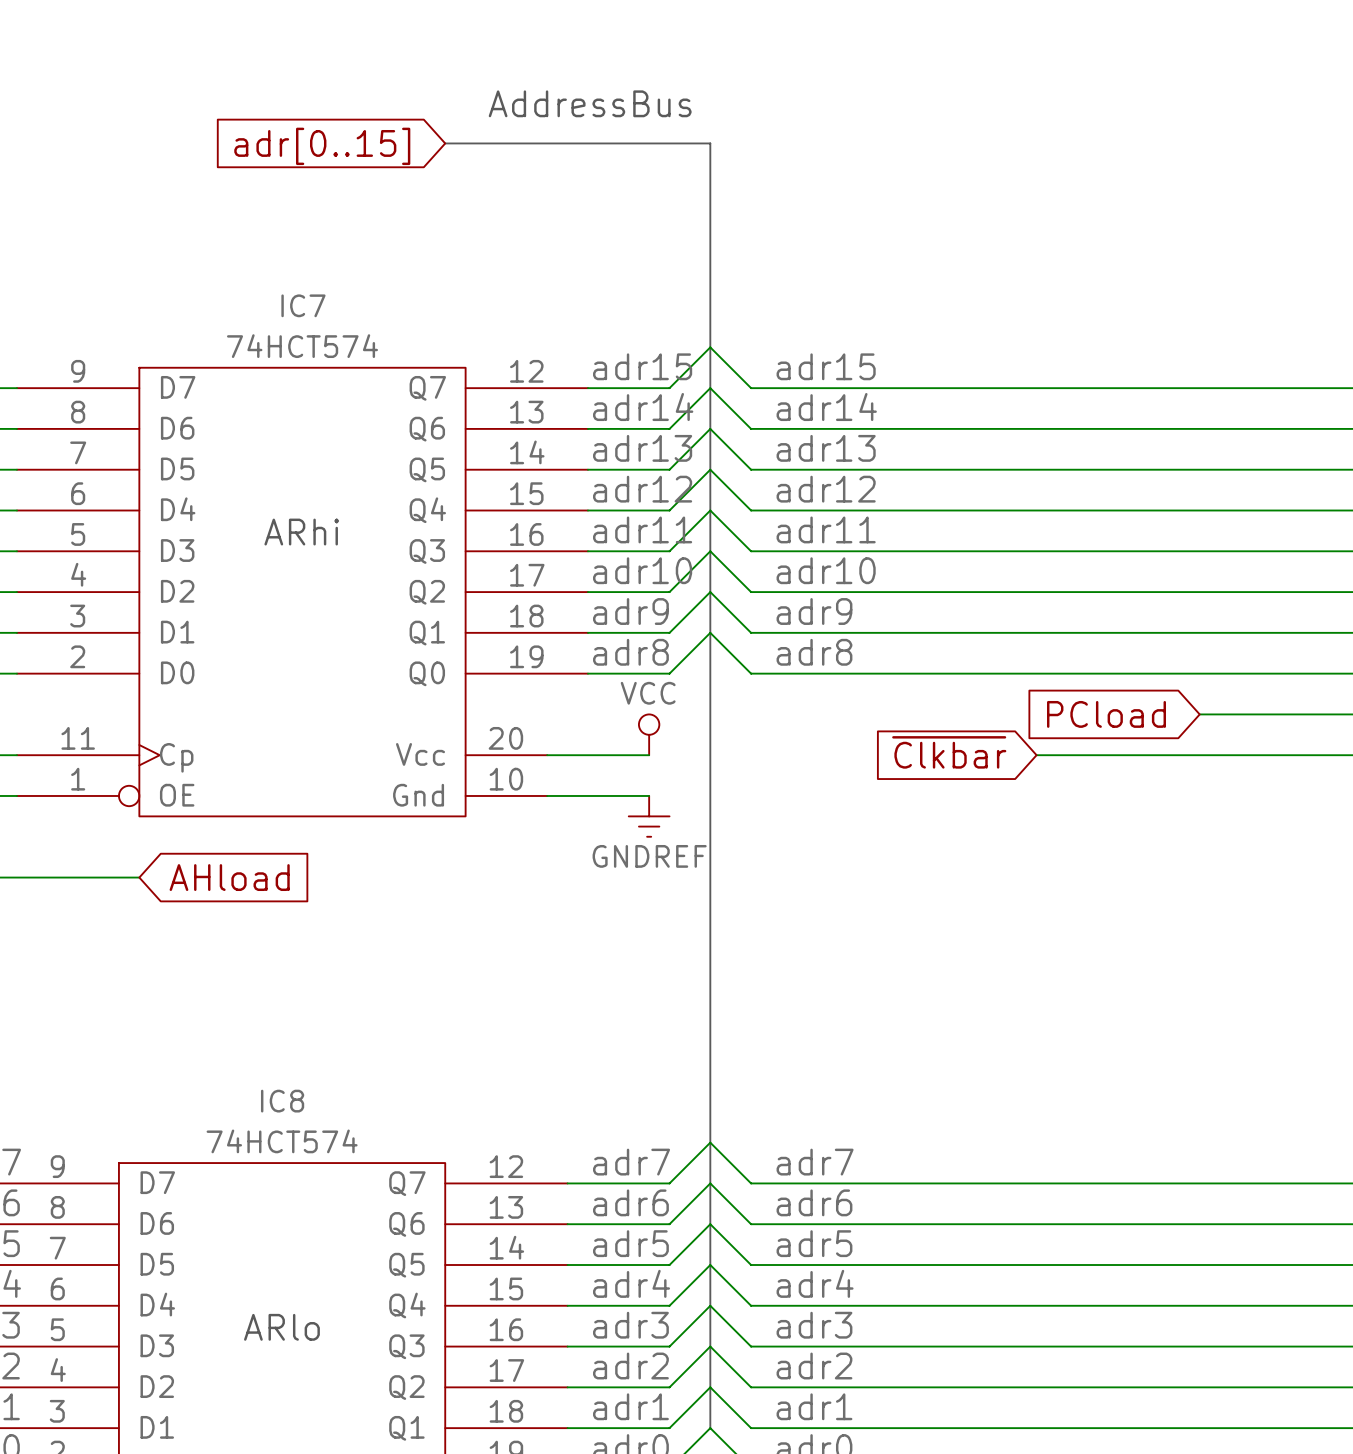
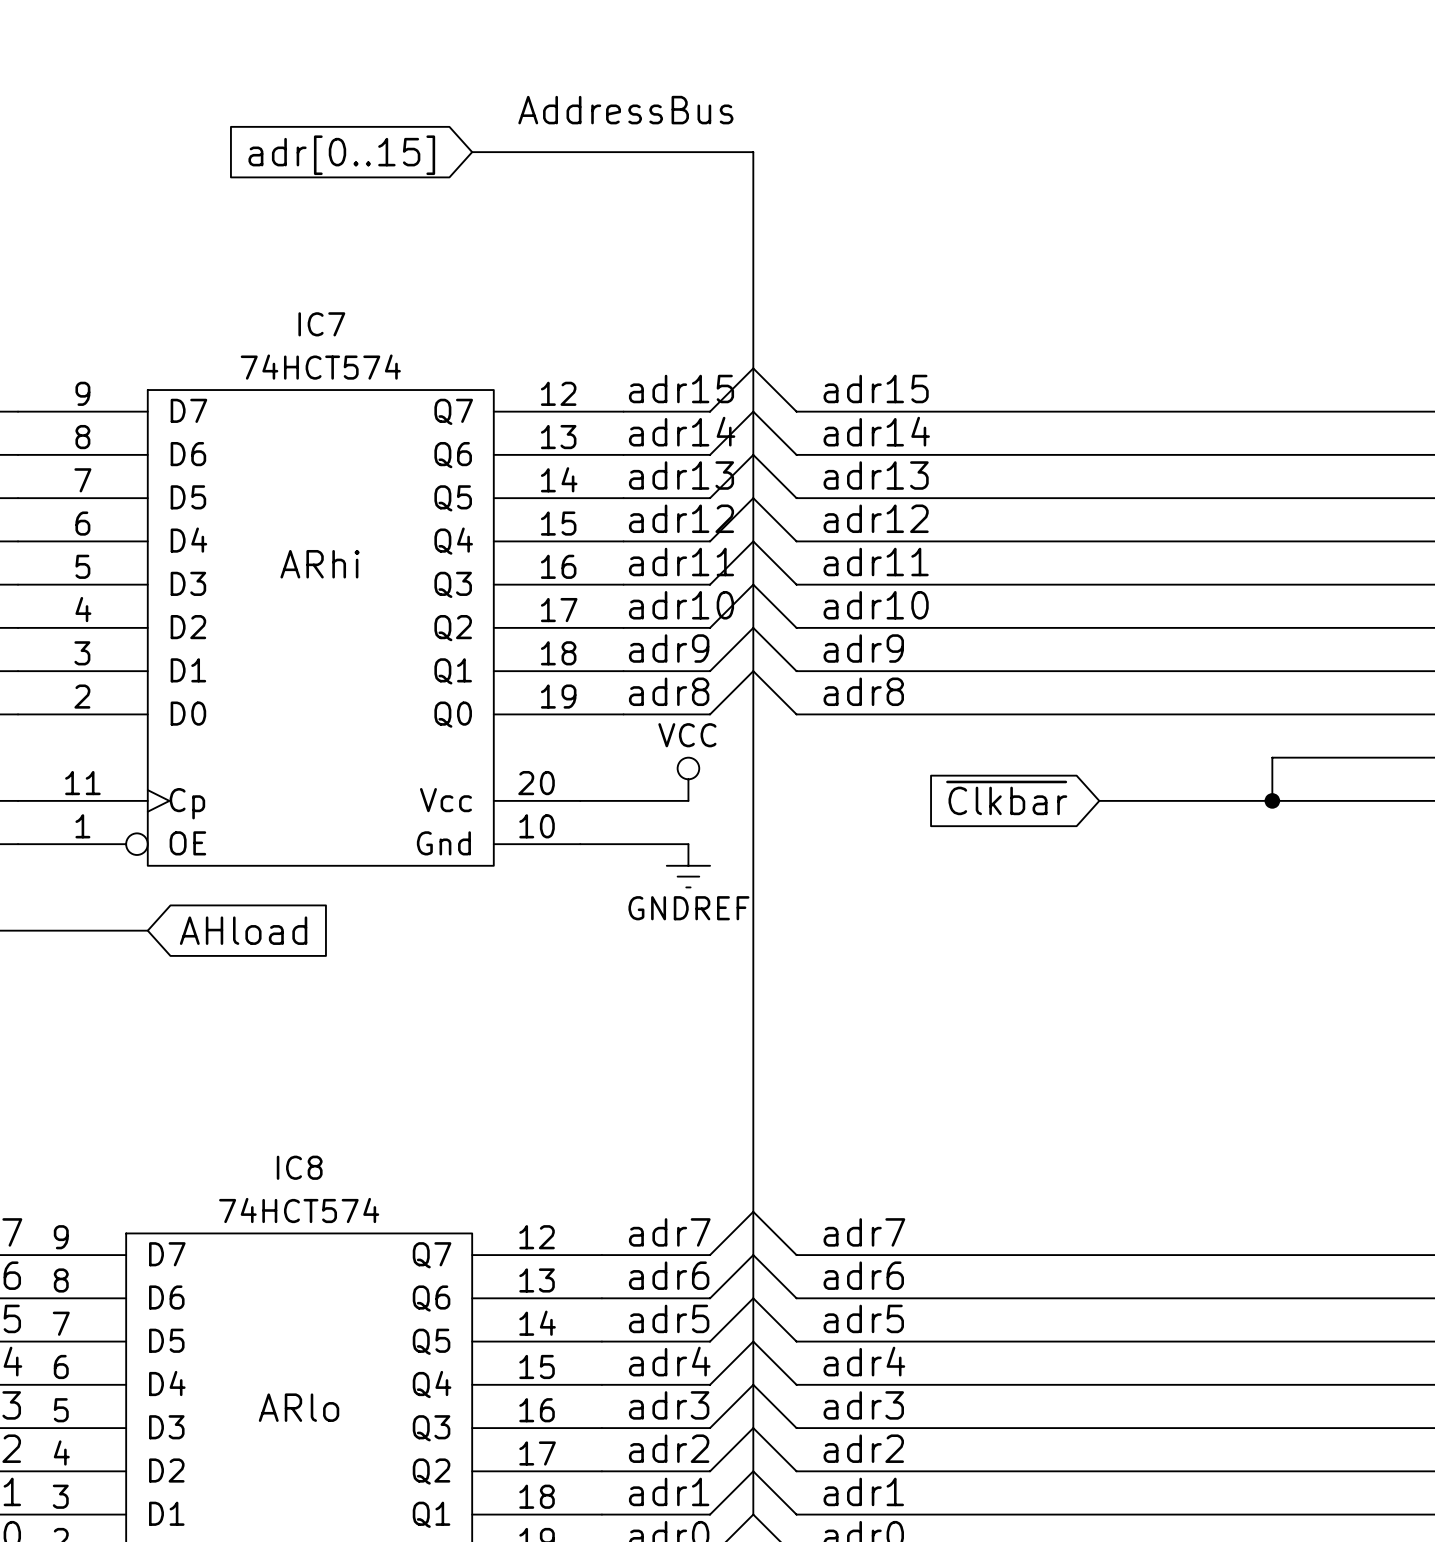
global label: PCload (1106, 714) -> none
wire: none -> (1272, 757) (1272, 800)
junction: none -> (1272, 800)

